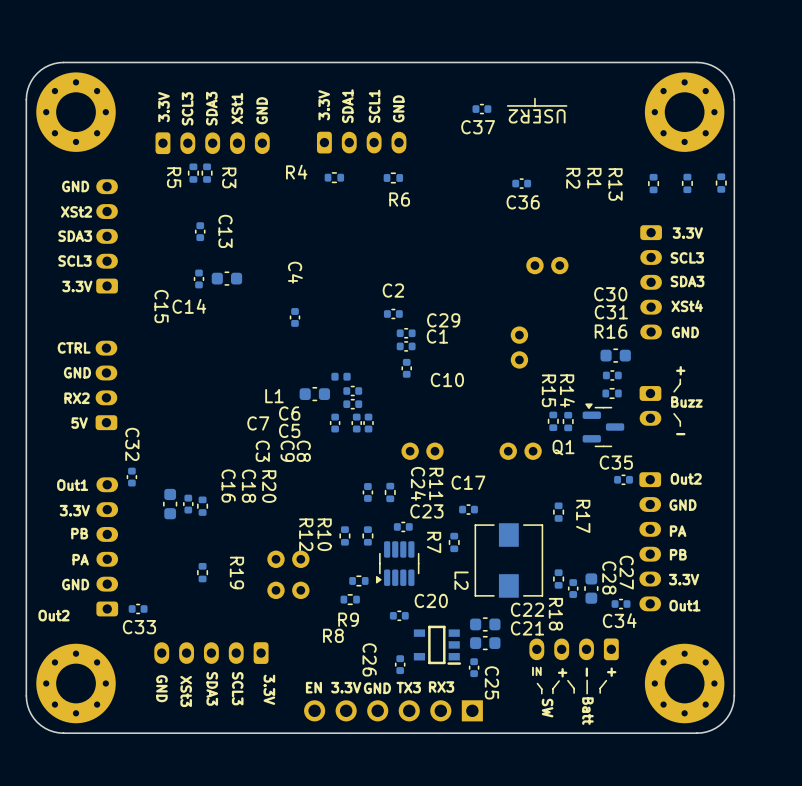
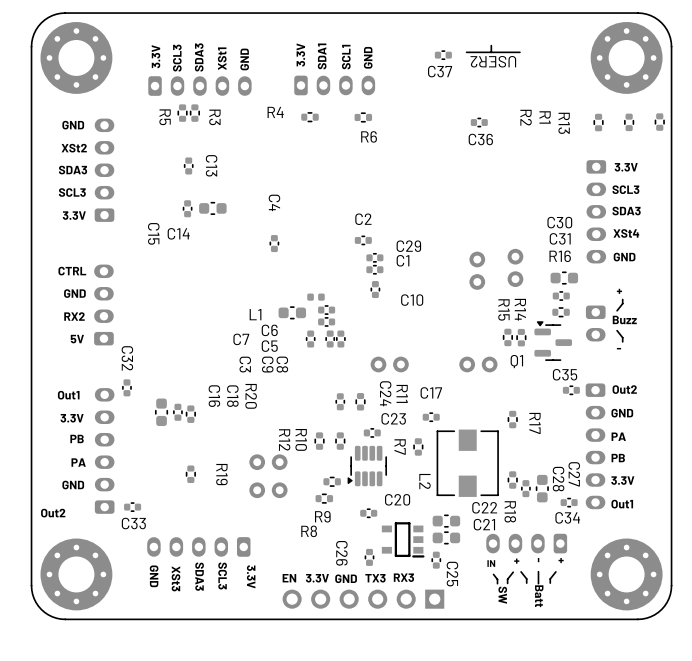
part rotation: 0° (547, 265) -> 90° clockwise (515, 267)
part position: (547, 265) -> (515, 267)

